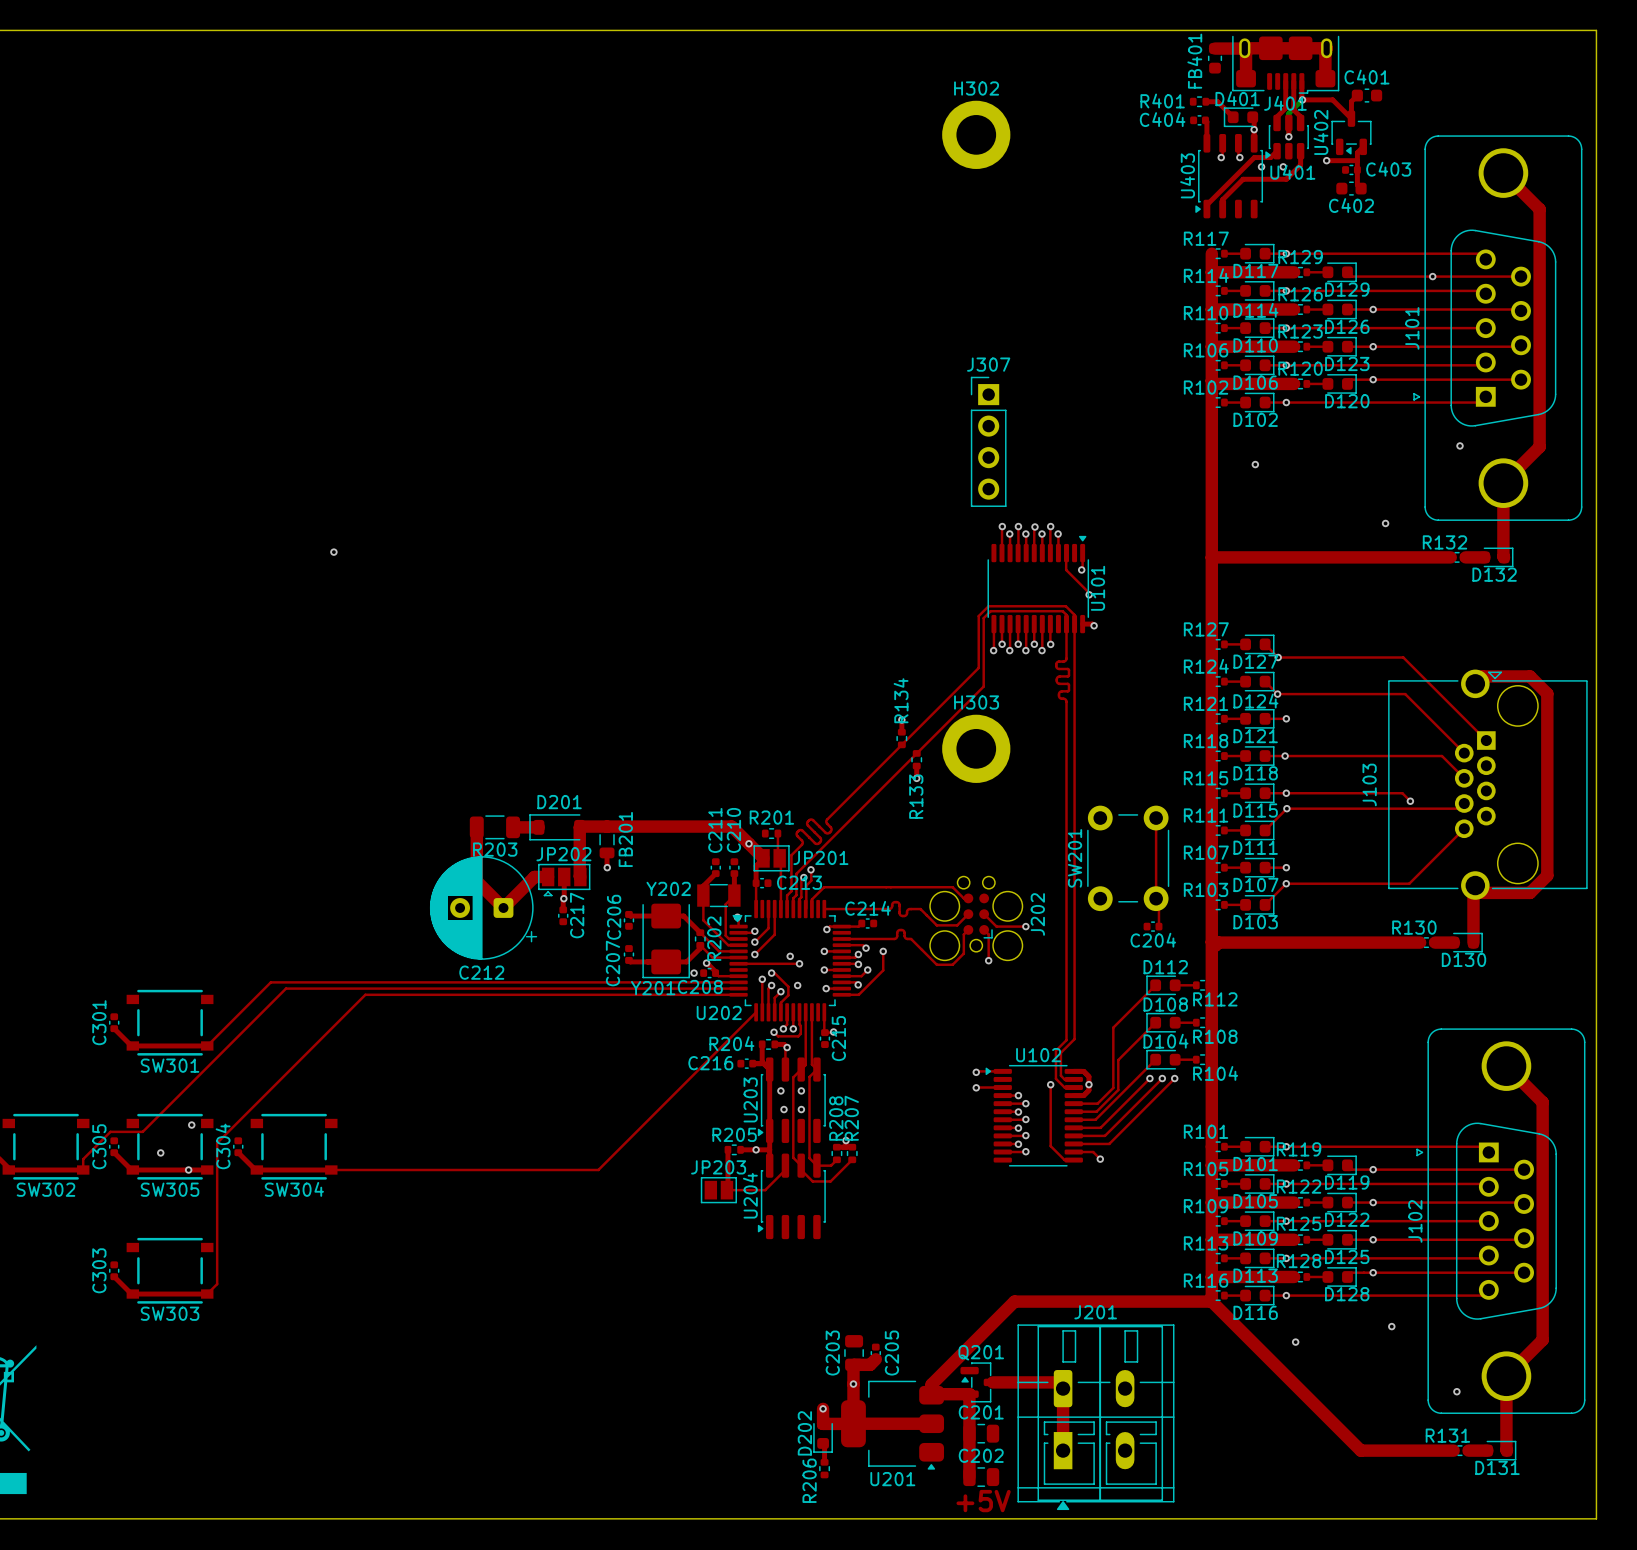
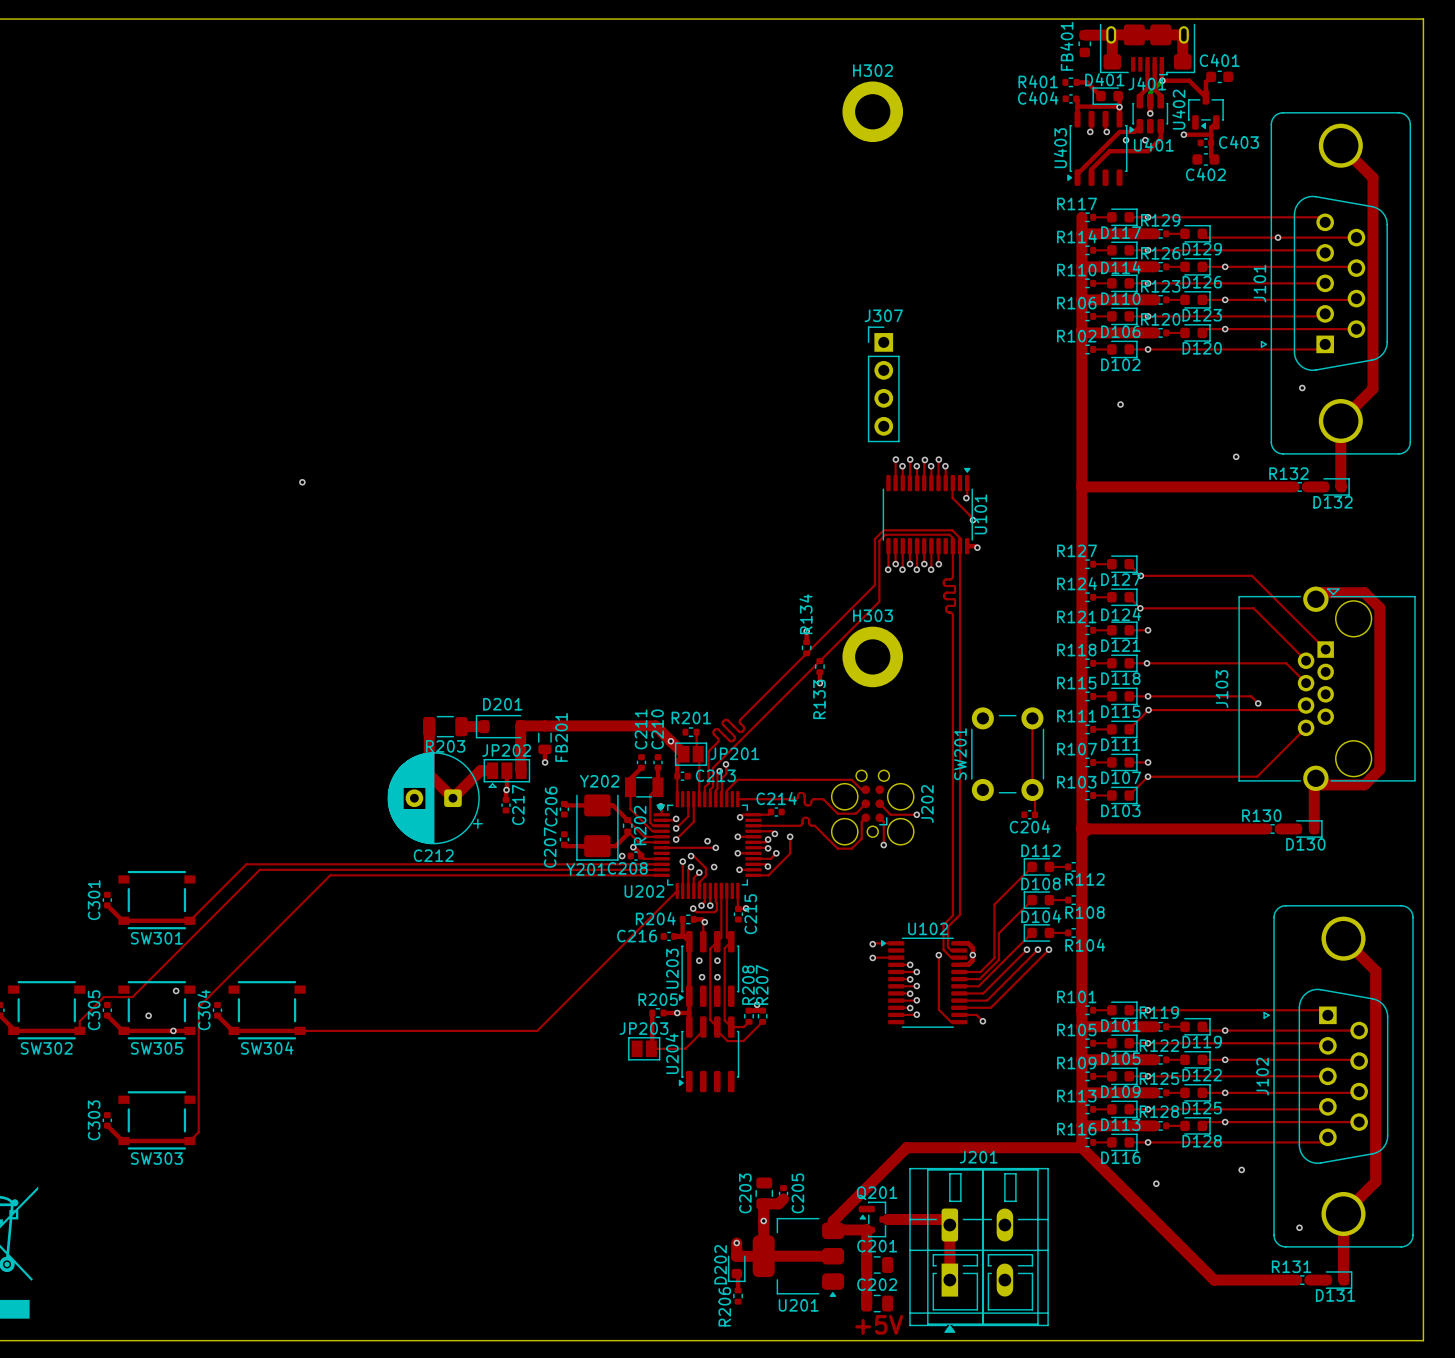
top track: none -> (1077, 107) (1119, 107)

